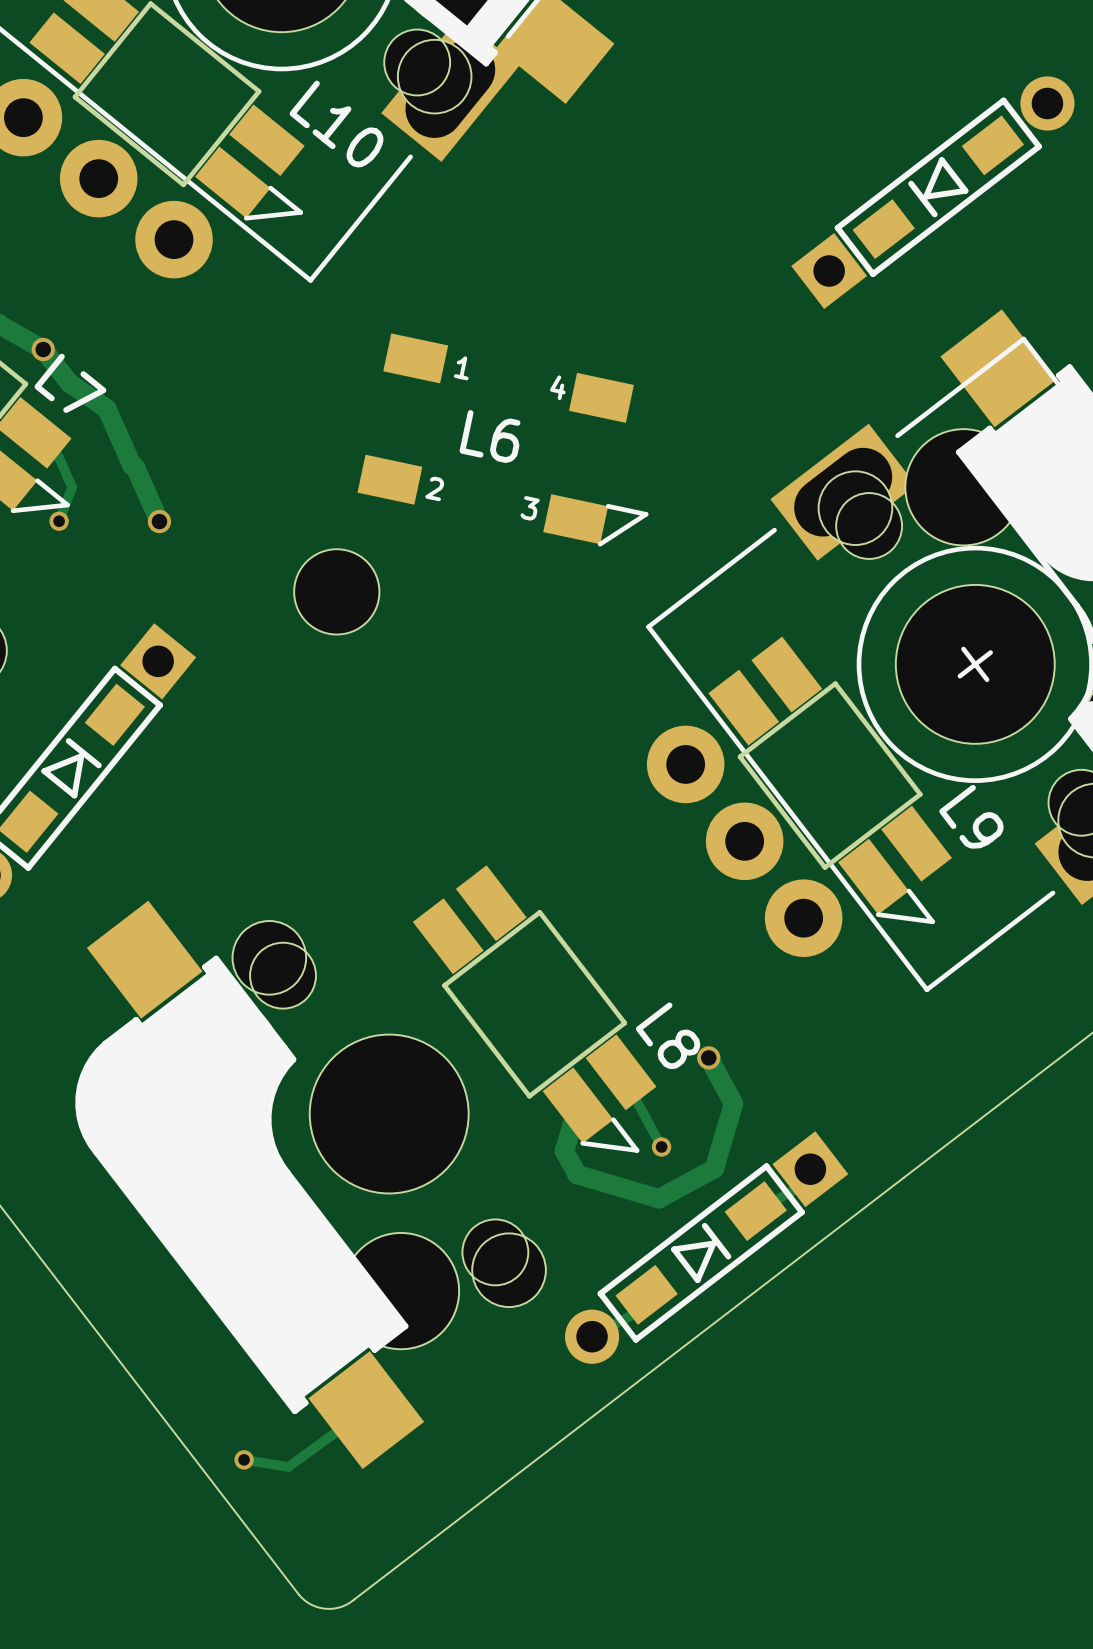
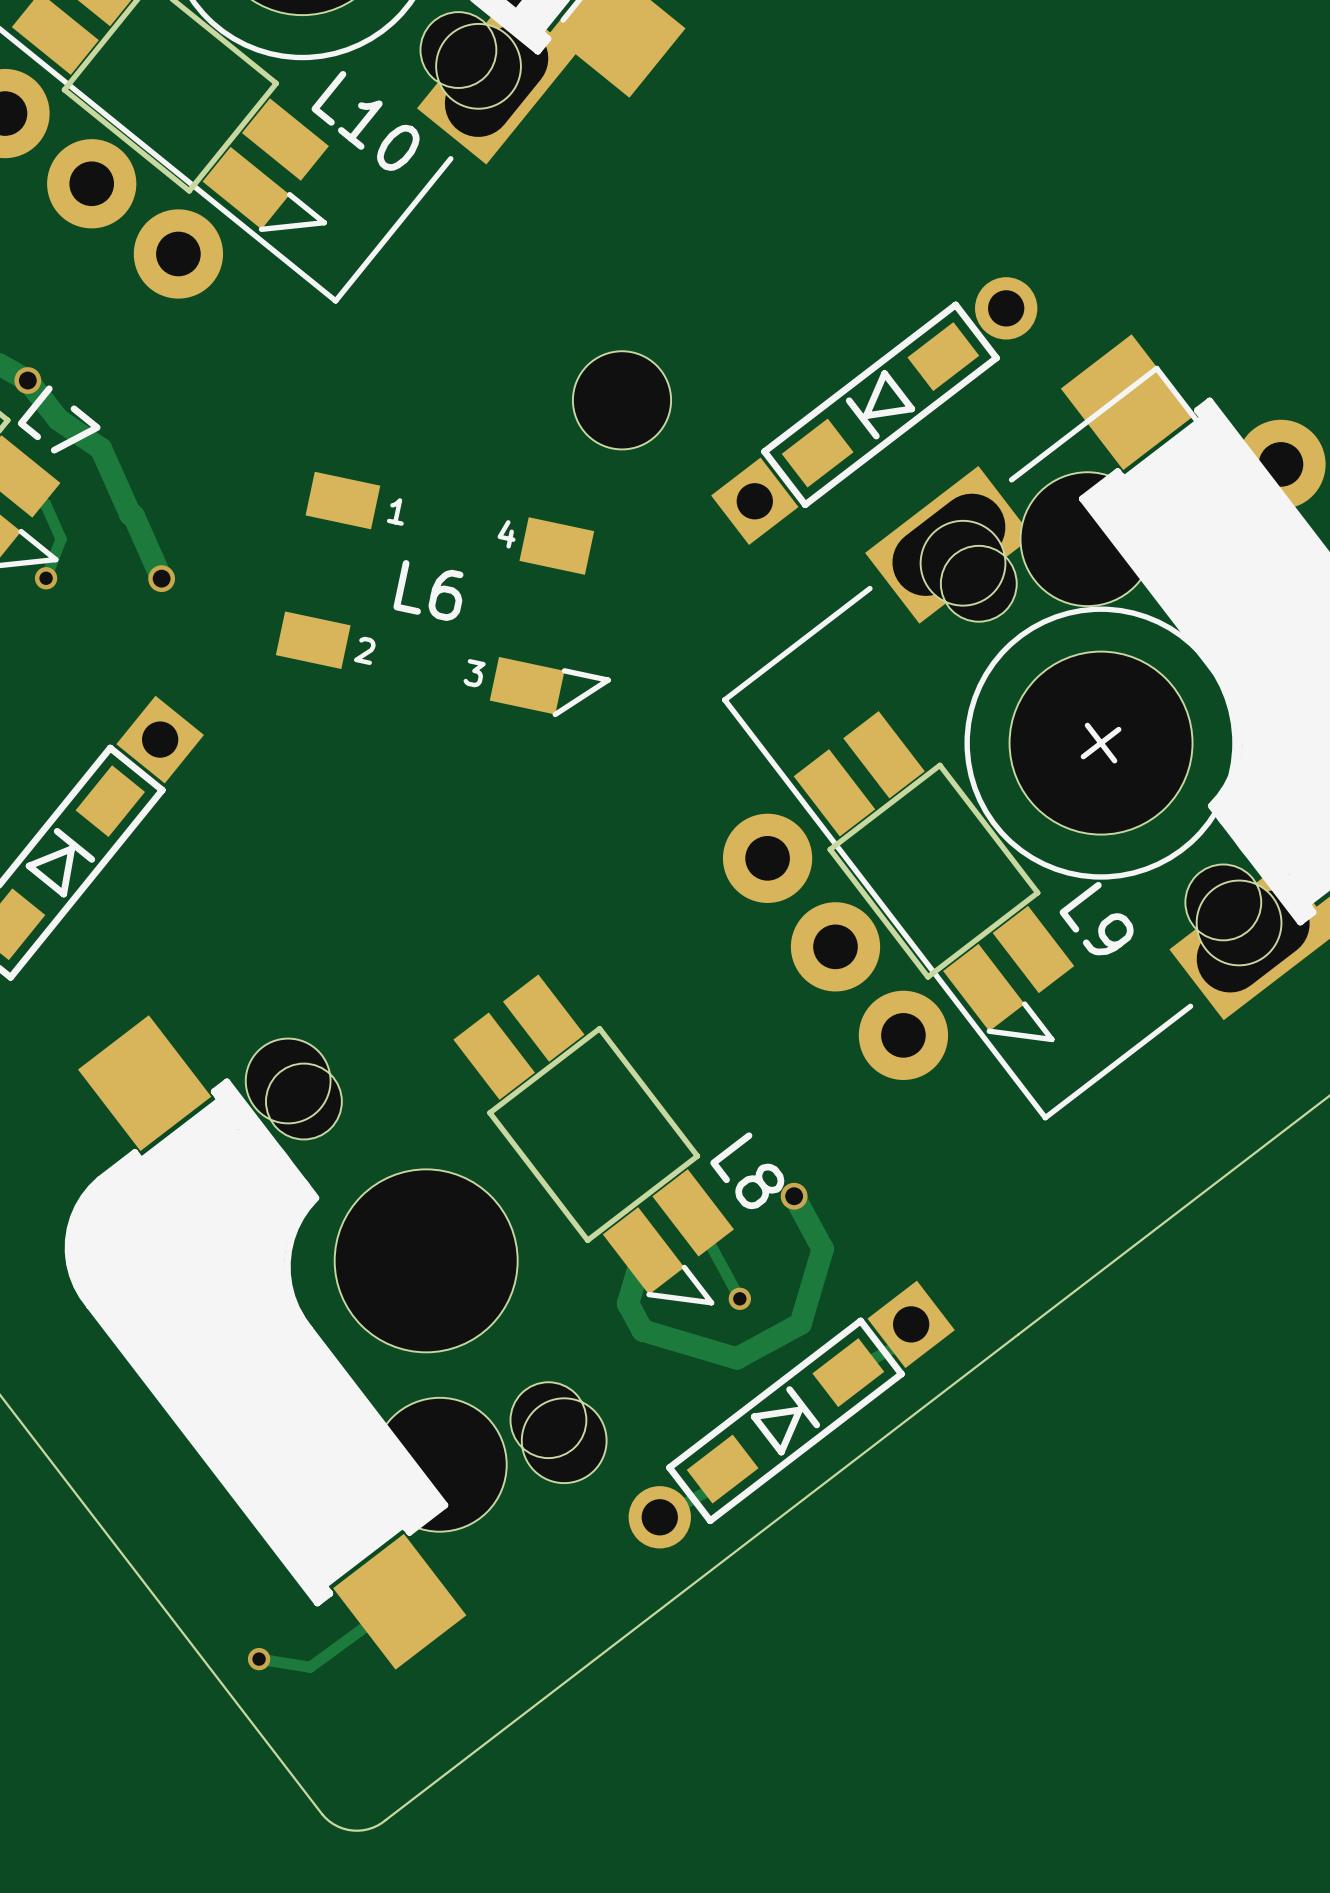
part position: (932, 192) -> (874, 411)
L6 position: (502, 439) -> (443, 594)
part position: (336, 591) -> (622, 400)

